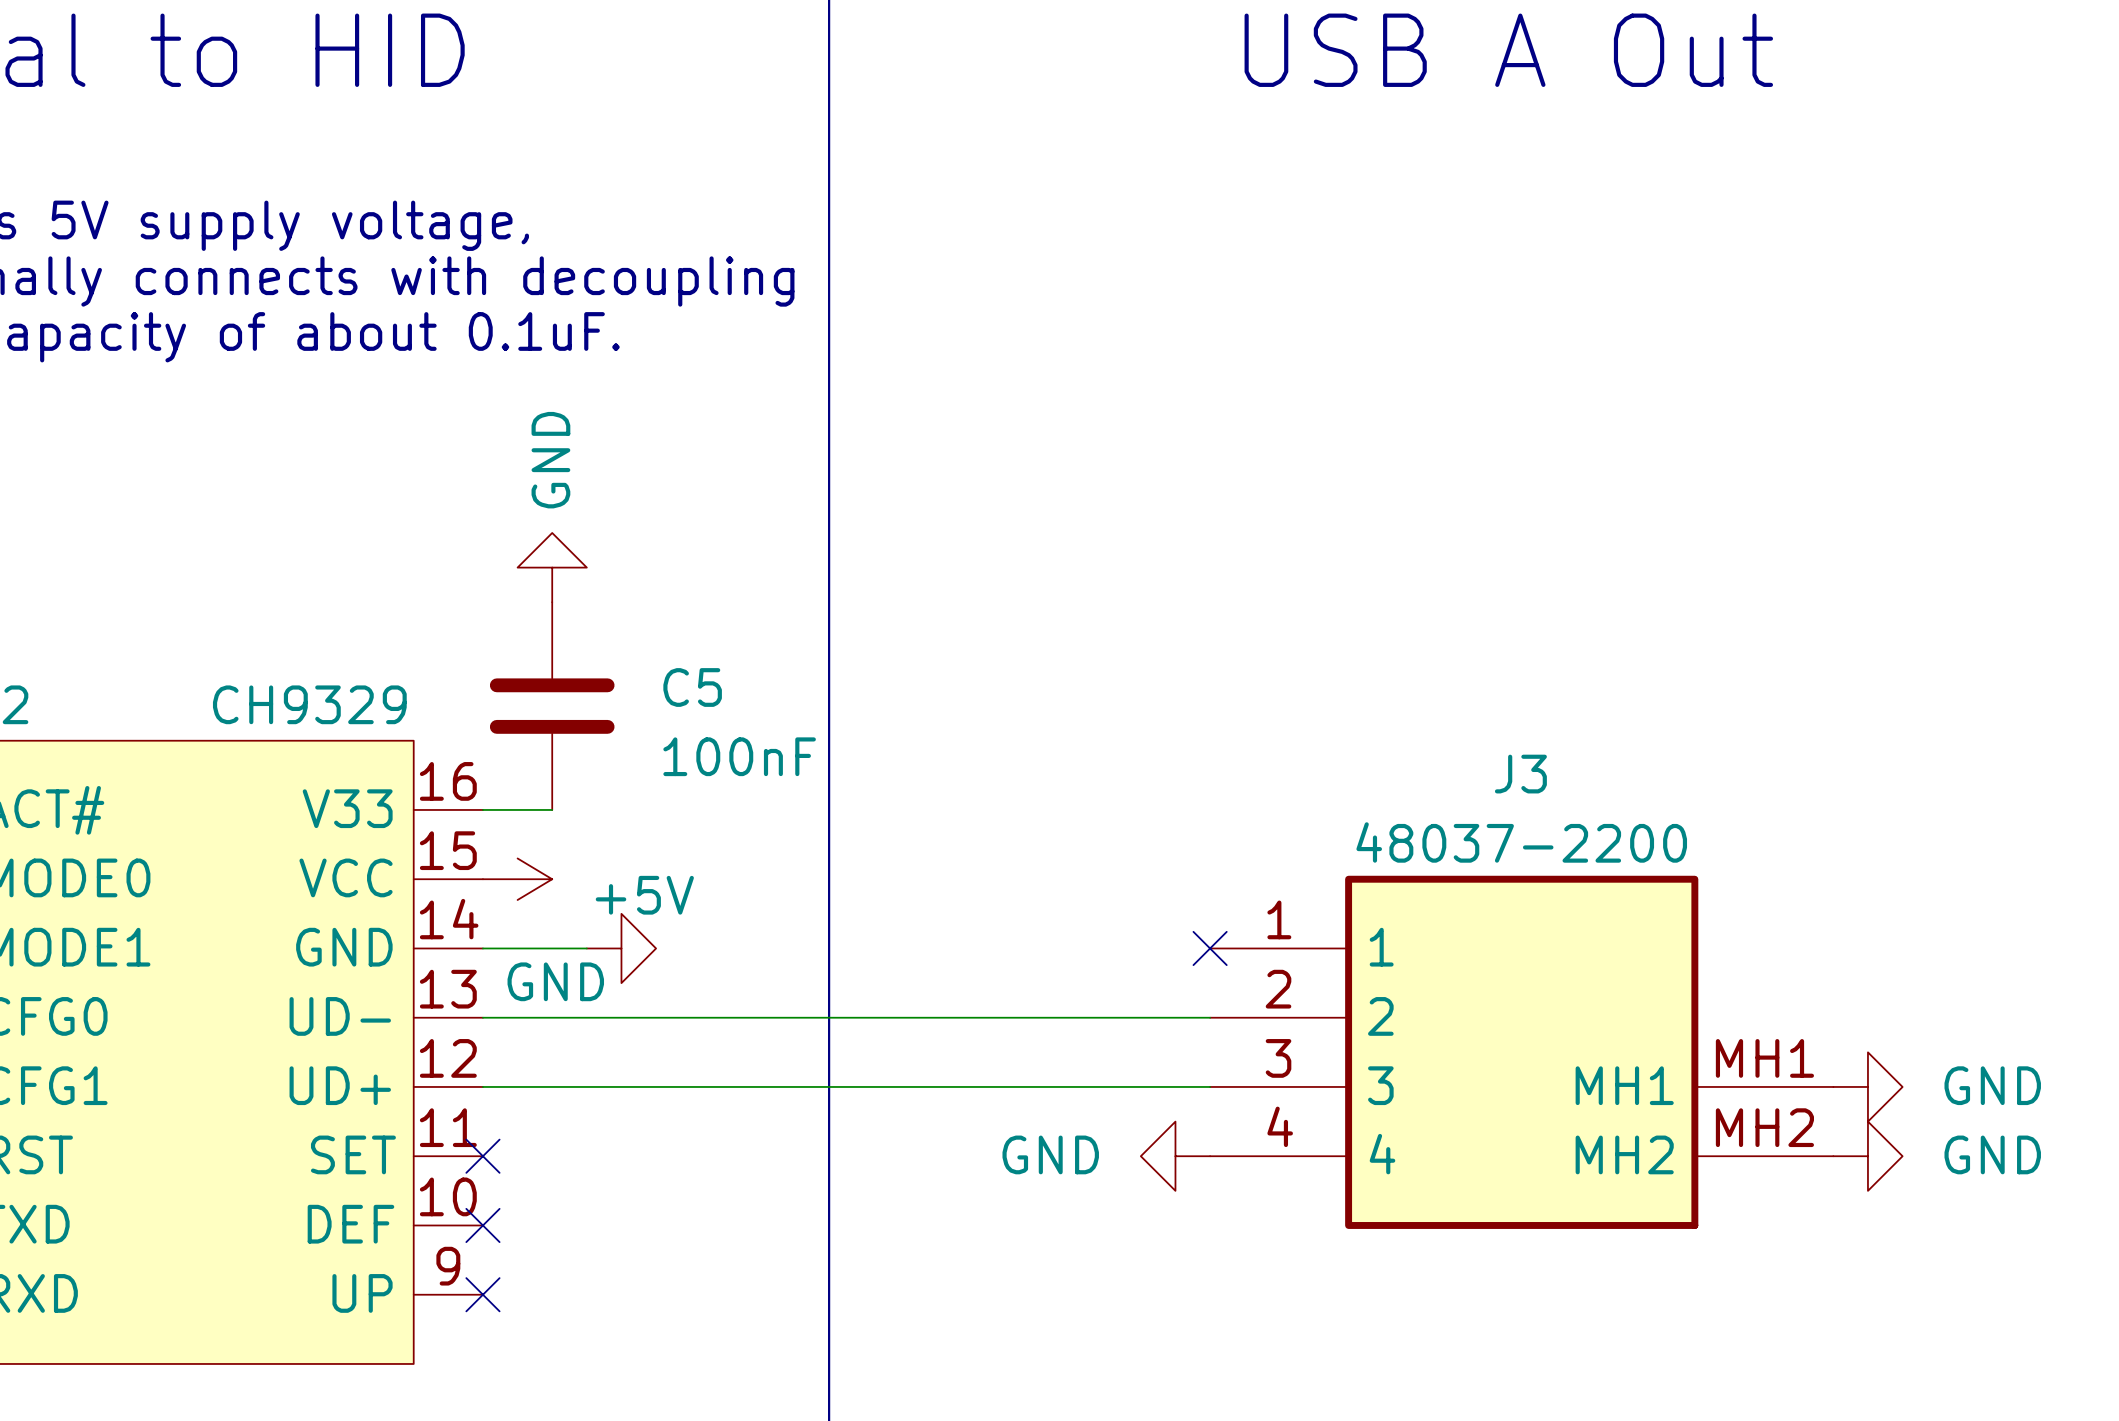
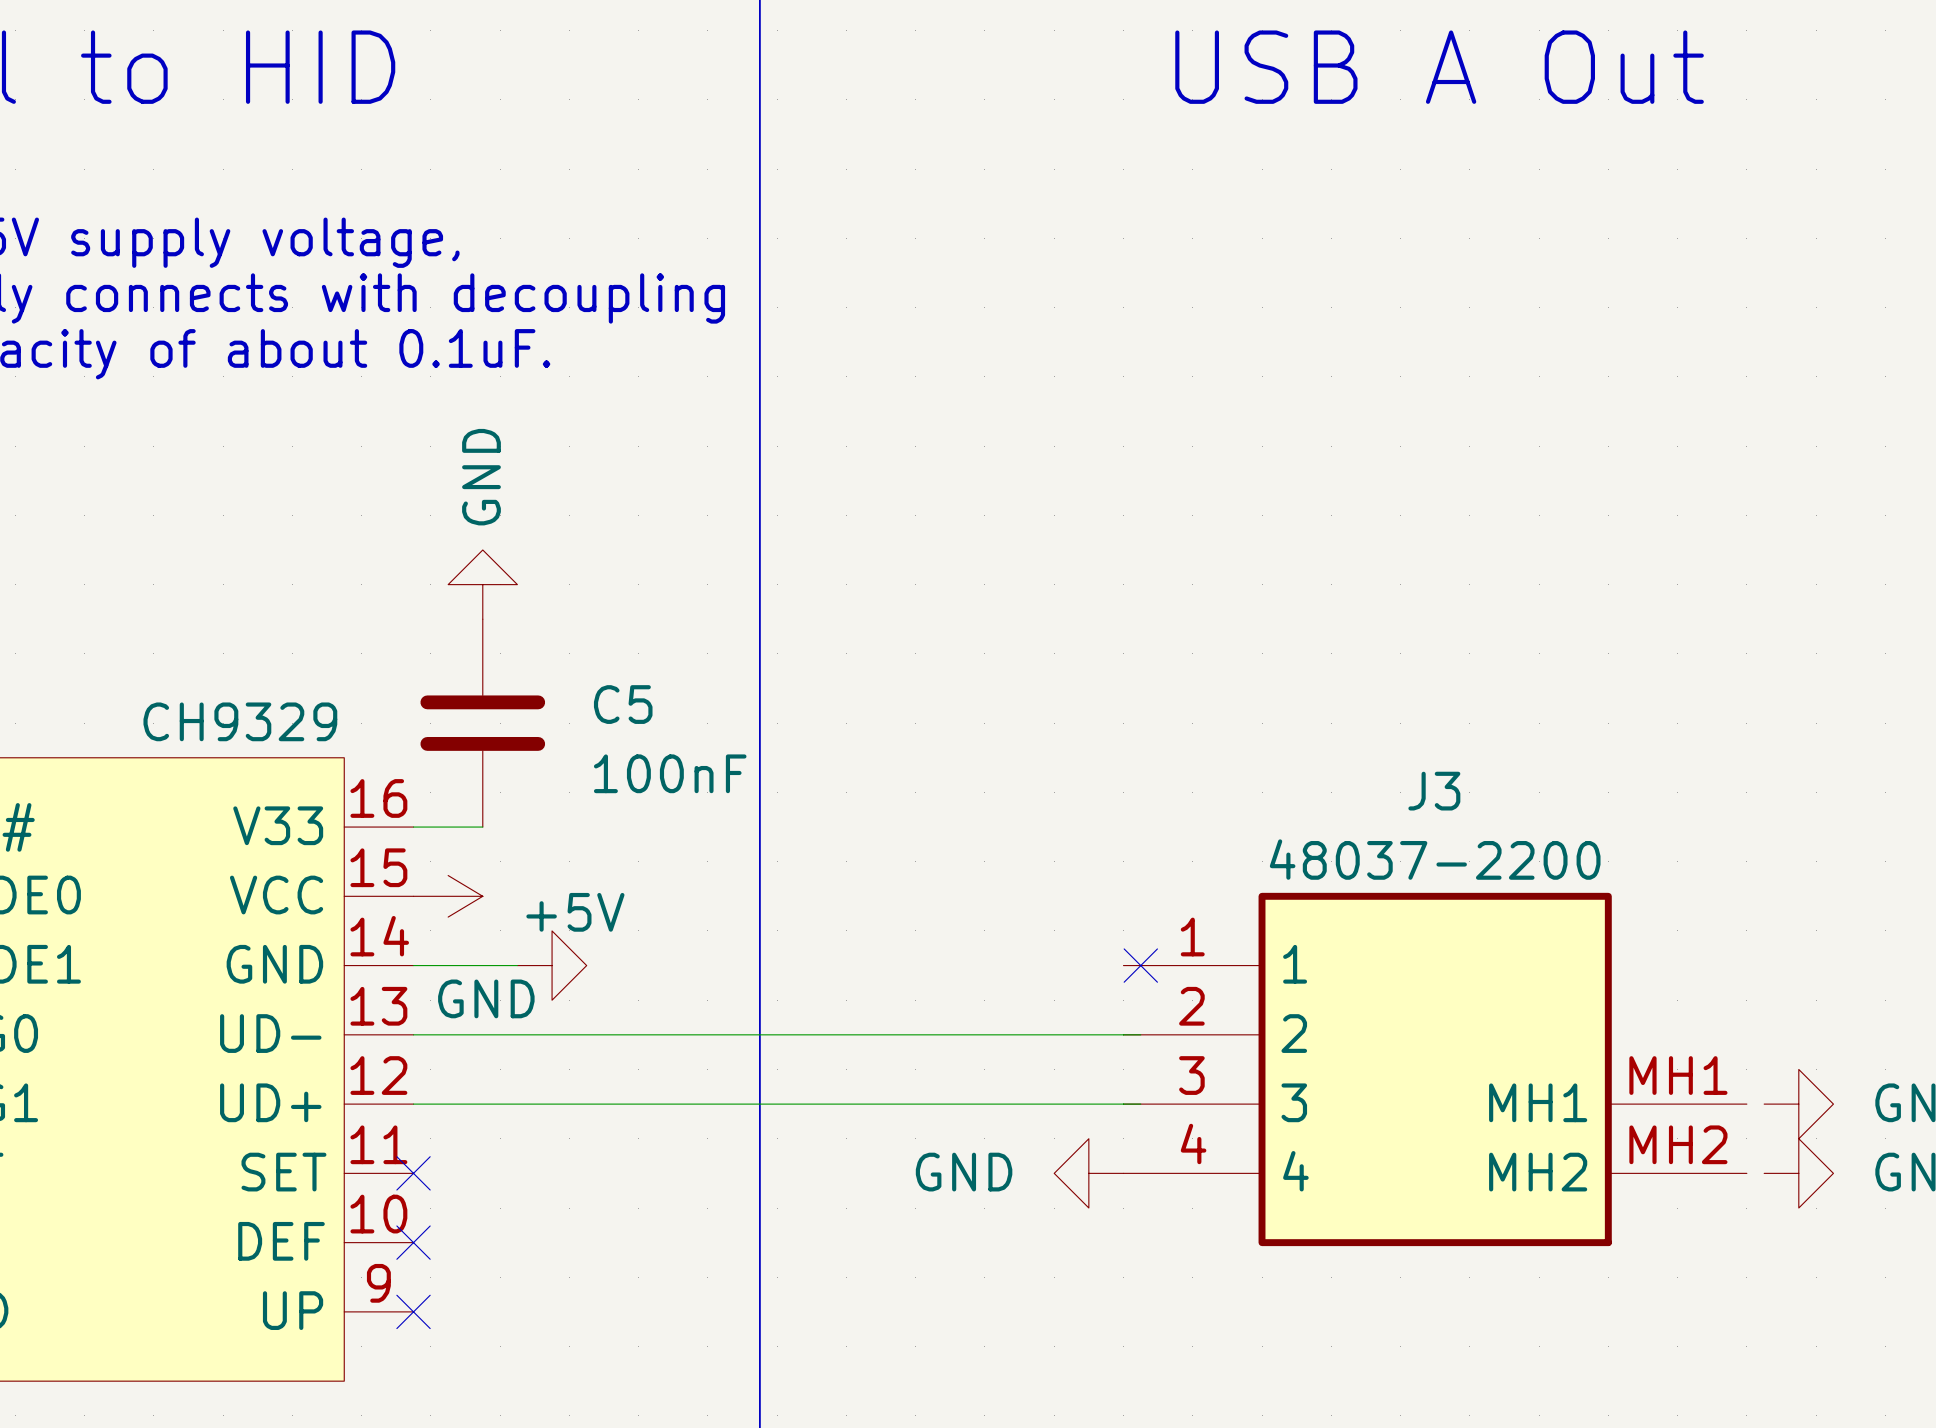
J3 position: (1521, 1052) -> (1435, 1069)
power symbol position: GND (1175, 1156) -> GND (1088, 1173)

